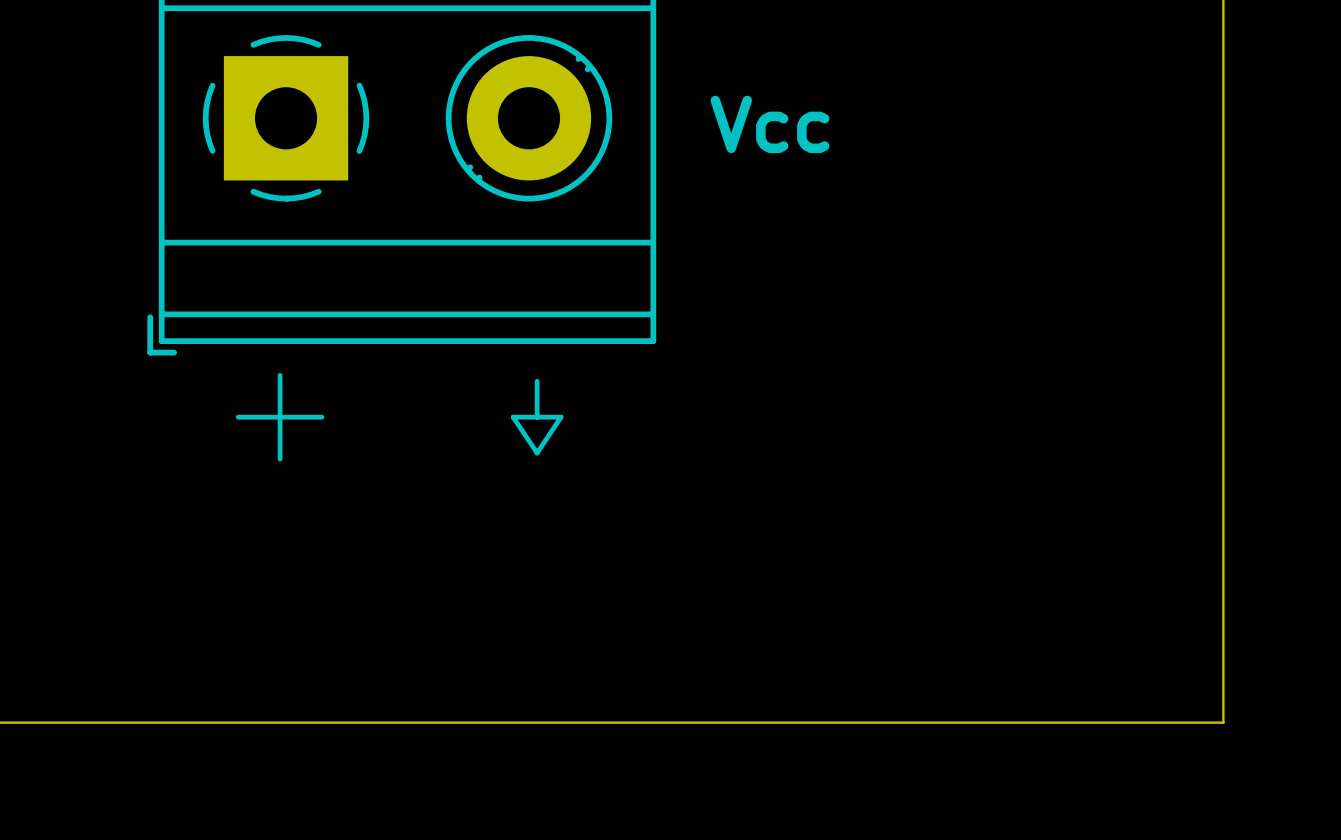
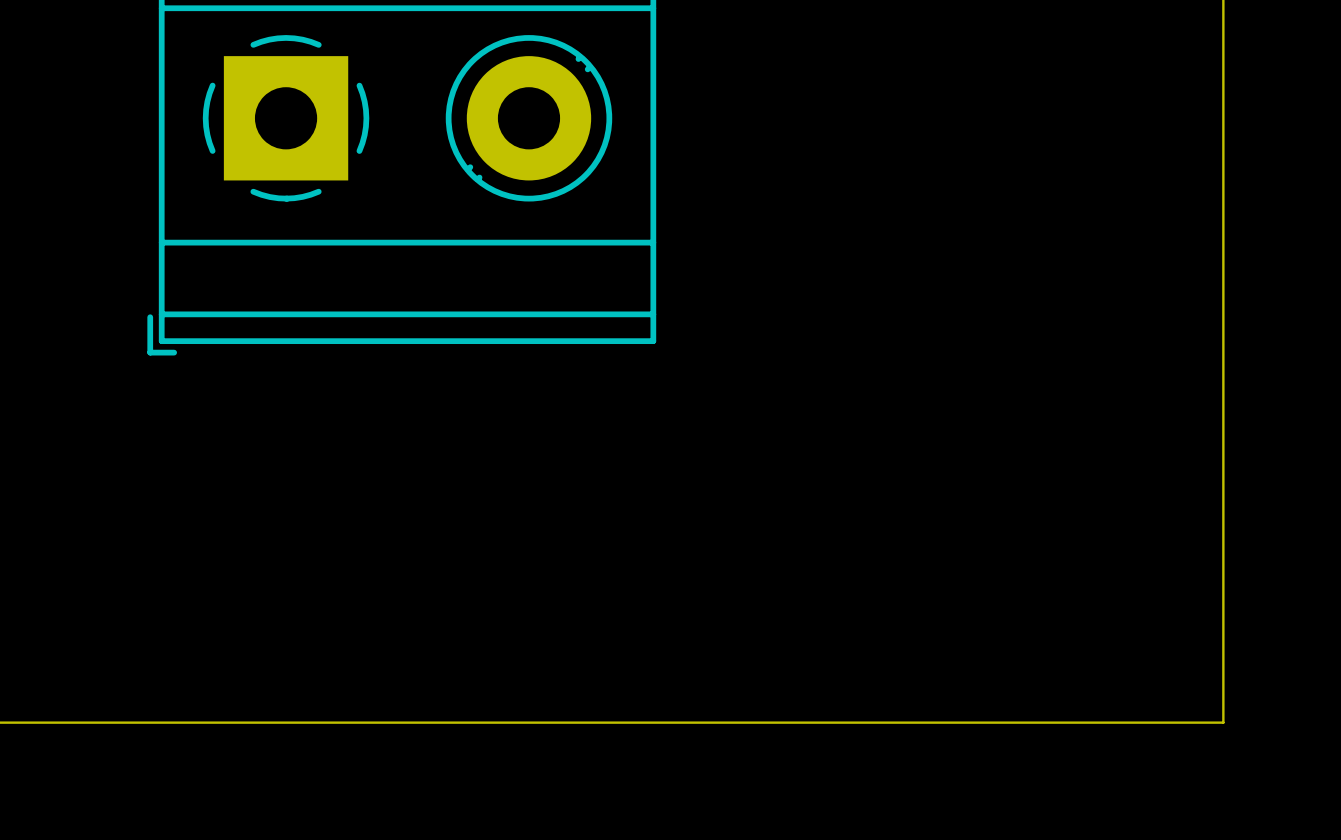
text: Vcc (770, 124) -> none
line: (280, 375) (280, 459) -> none
line: (537, 381) (537, 417) -> none
line: (238, 417) (321, 417) -> none
line: (513, 417) (561, 417) (537, 453) (513, 417) -> none

